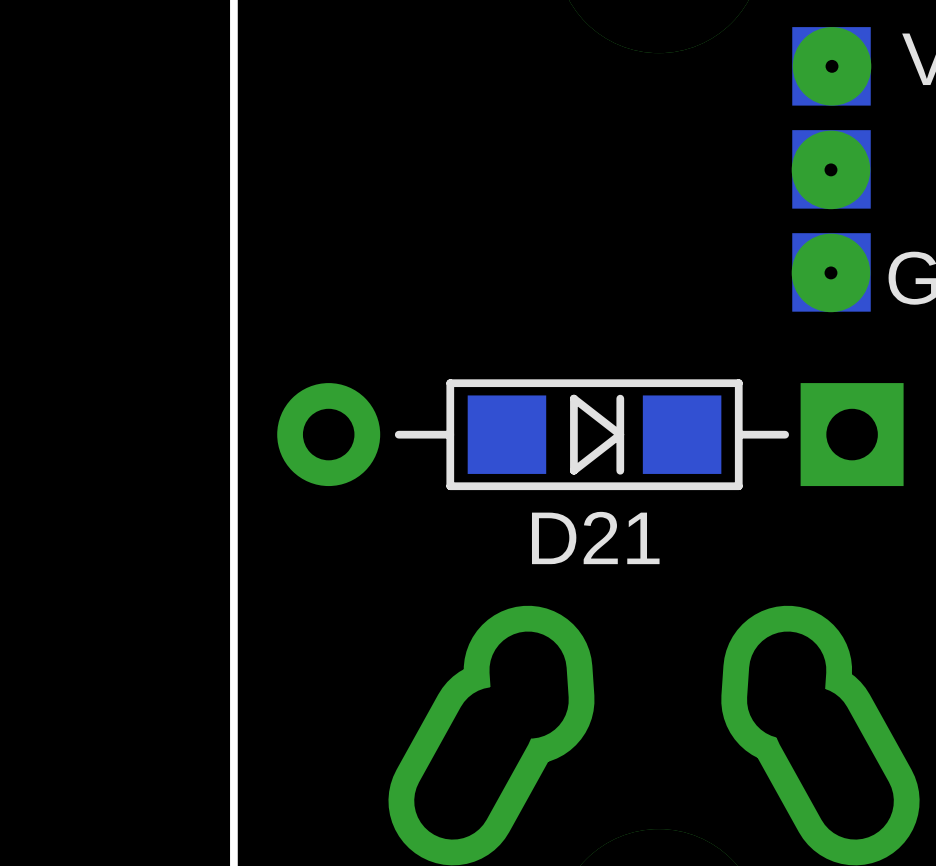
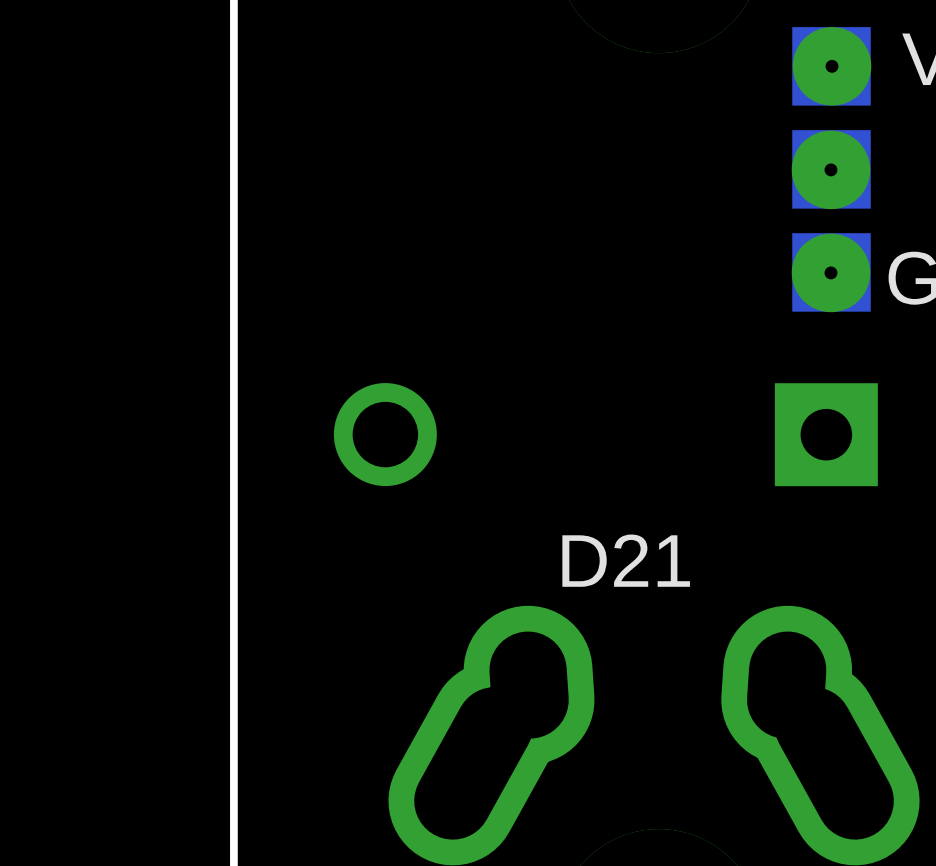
part footprint: [277, 379, 904, 491] -> [333, 383, 878, 487]

